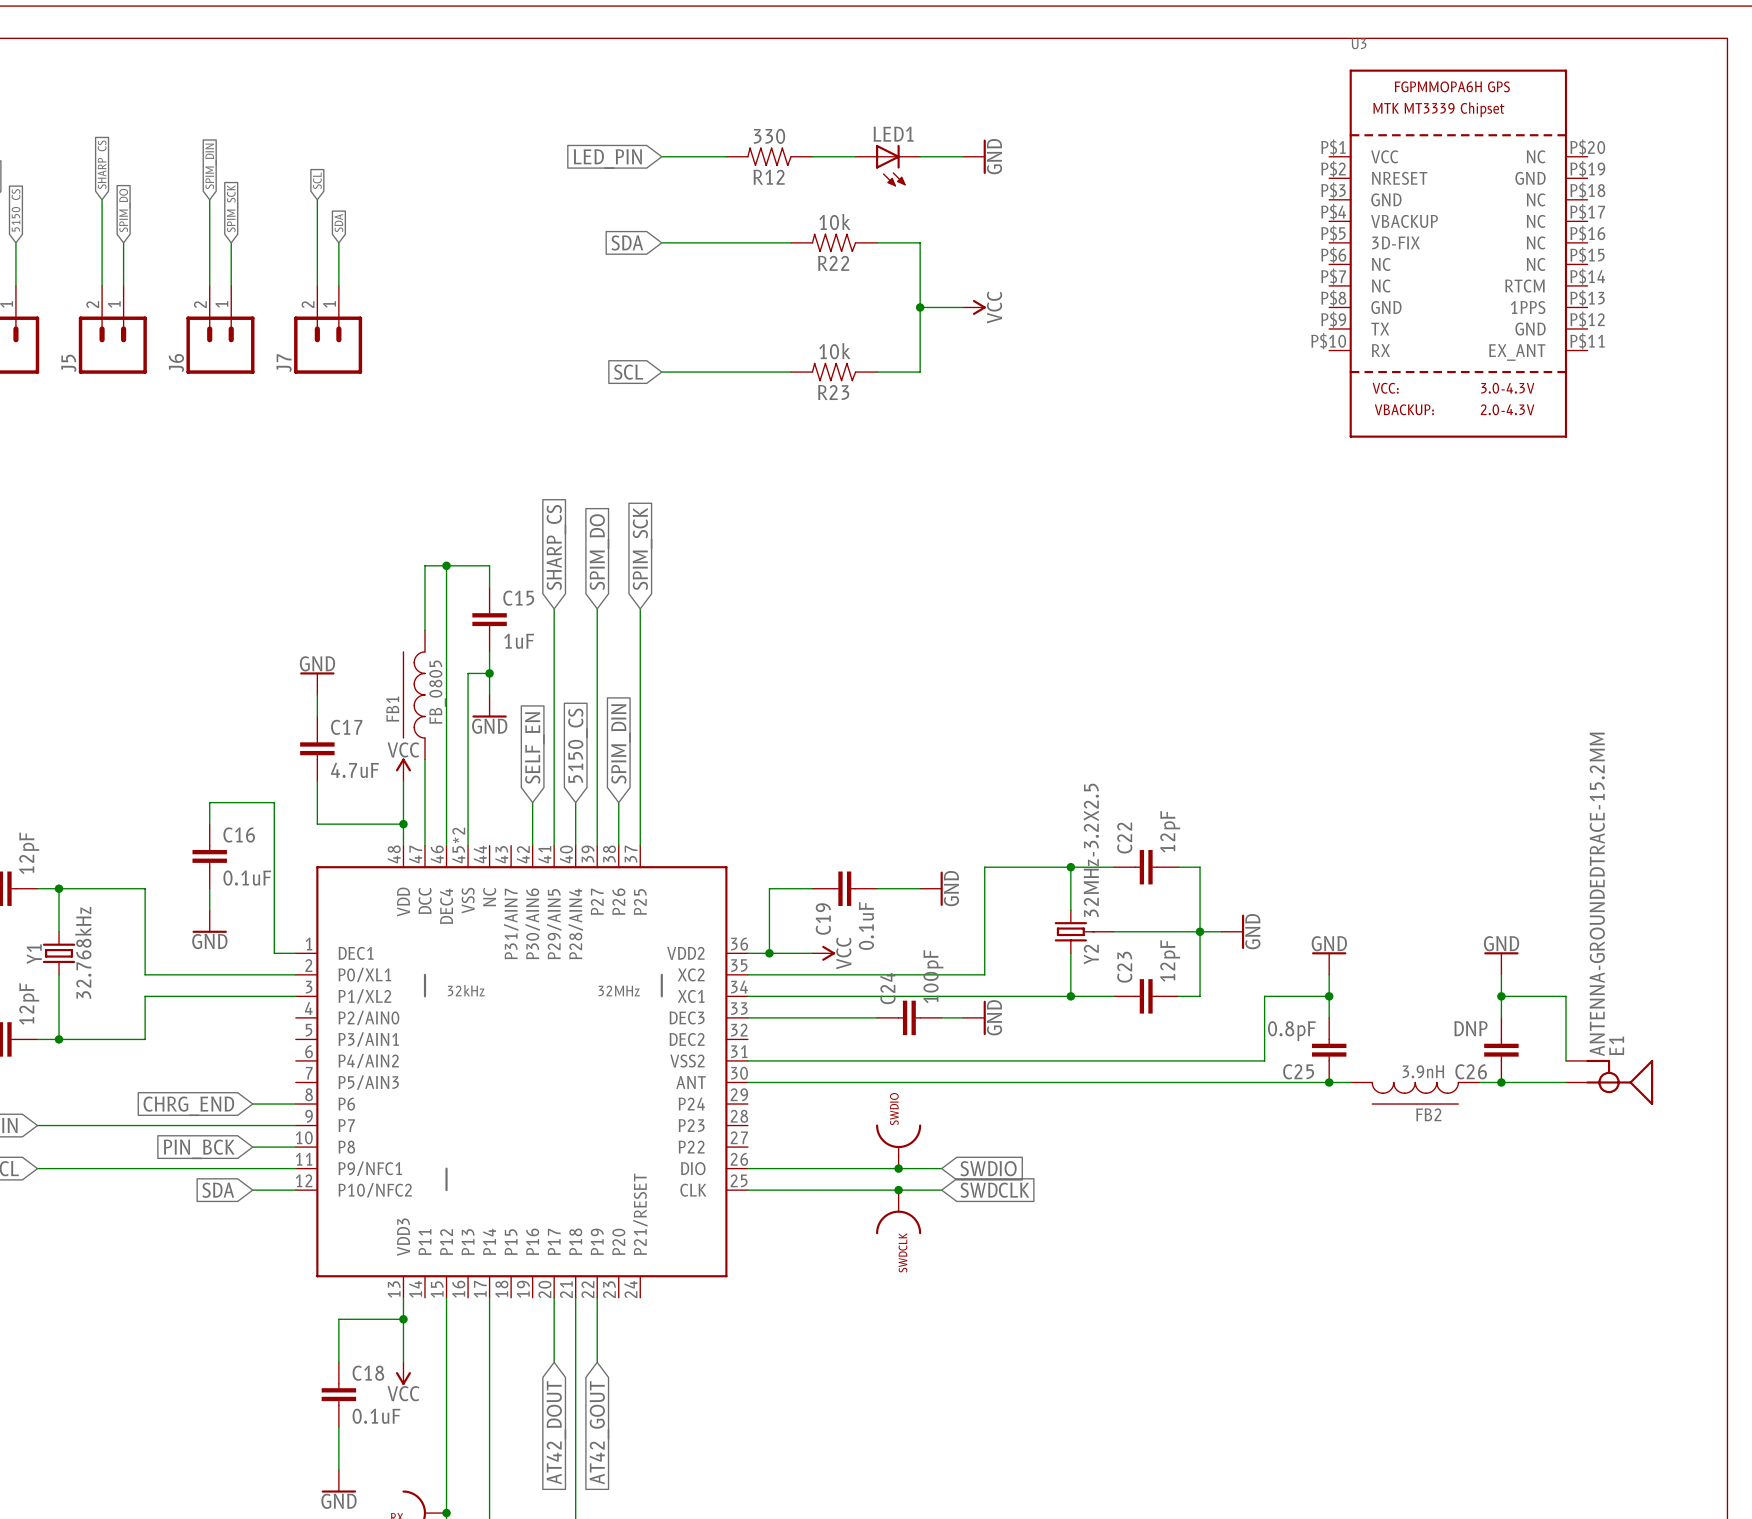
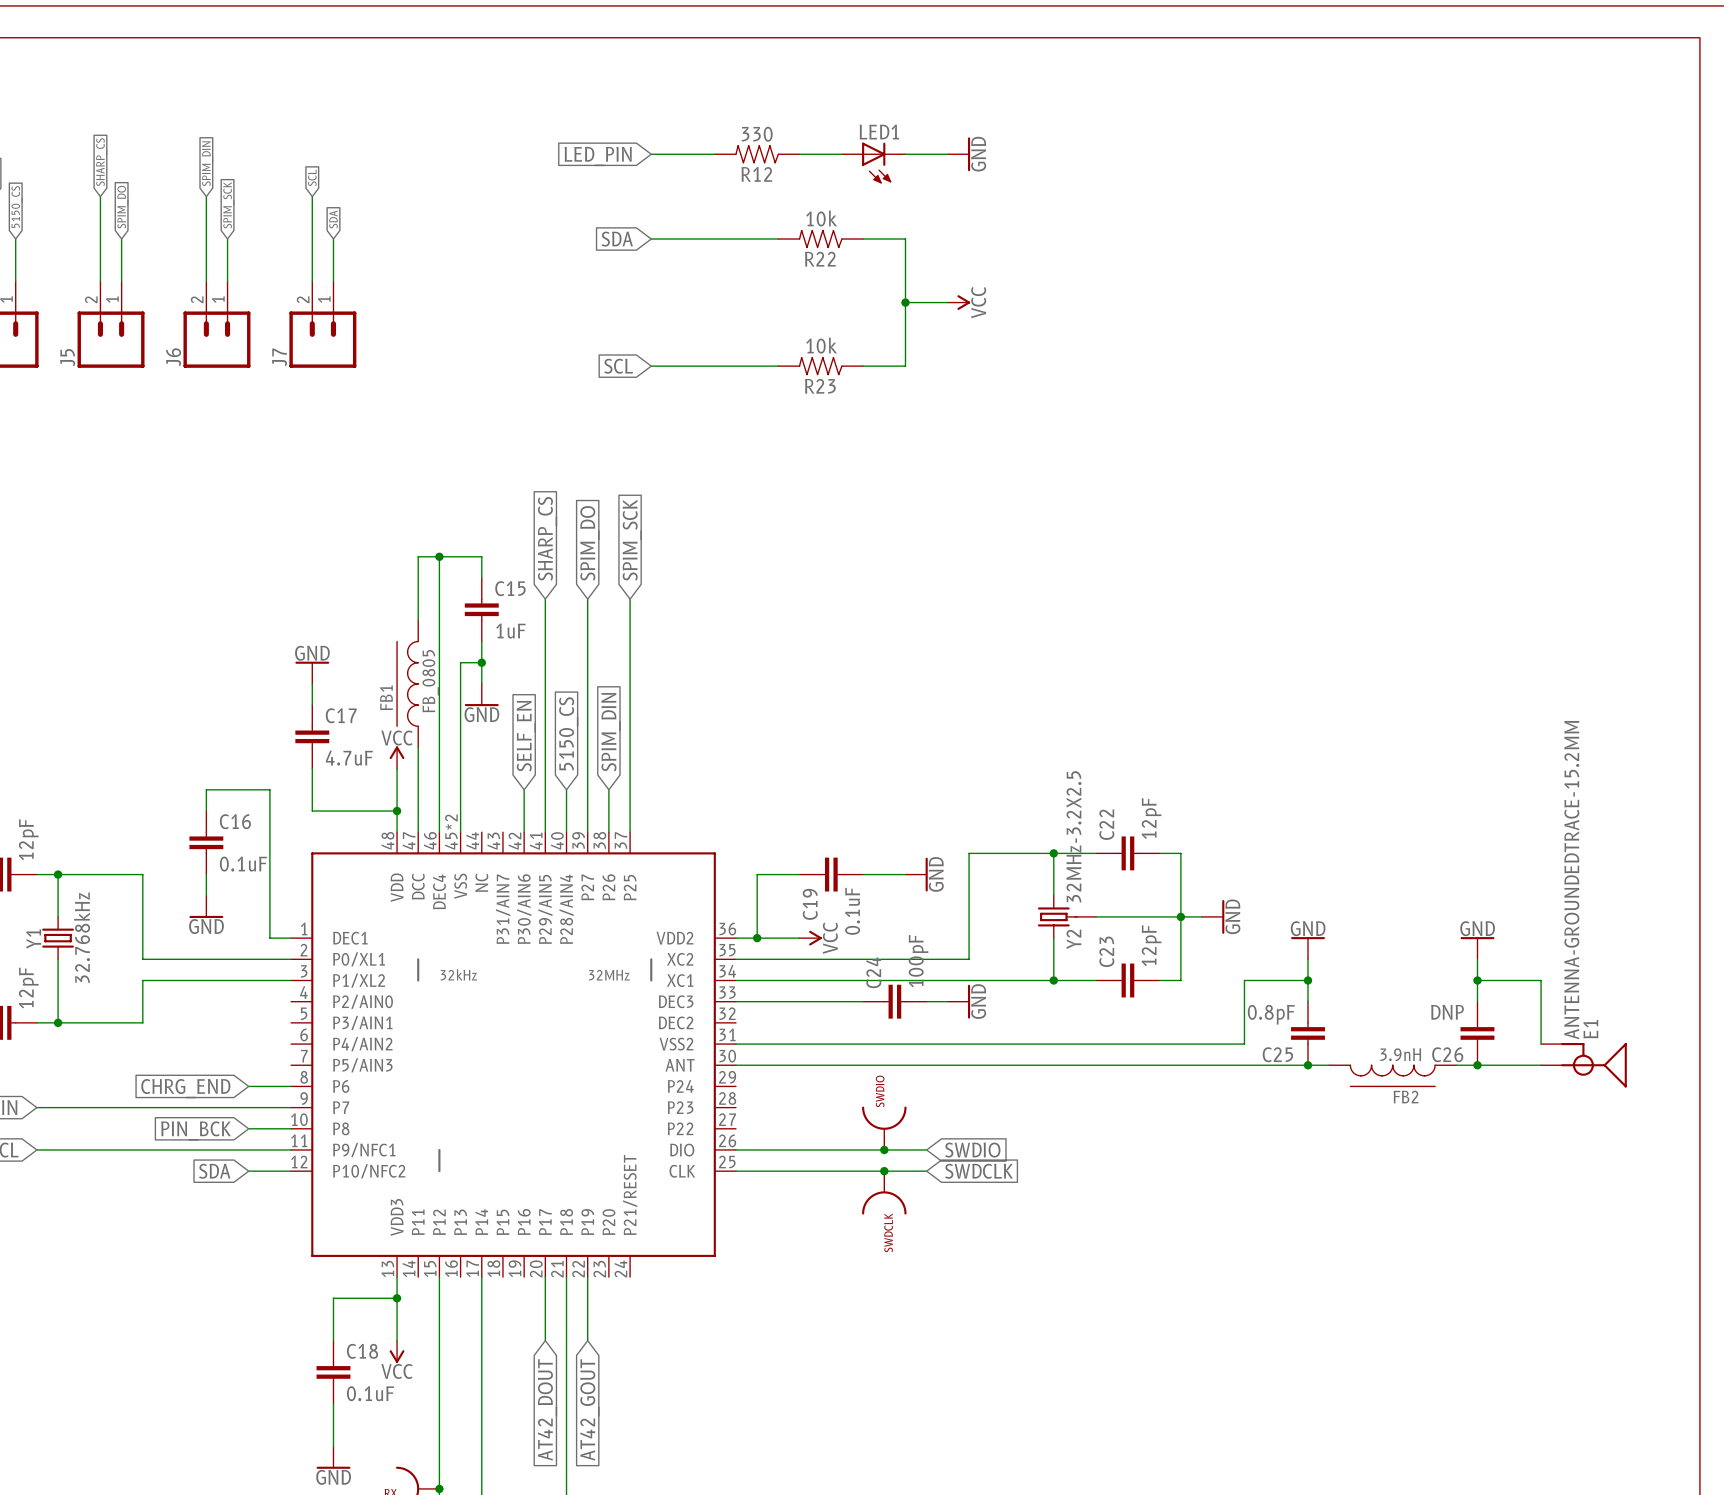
U3: (1458, 253) -> none

